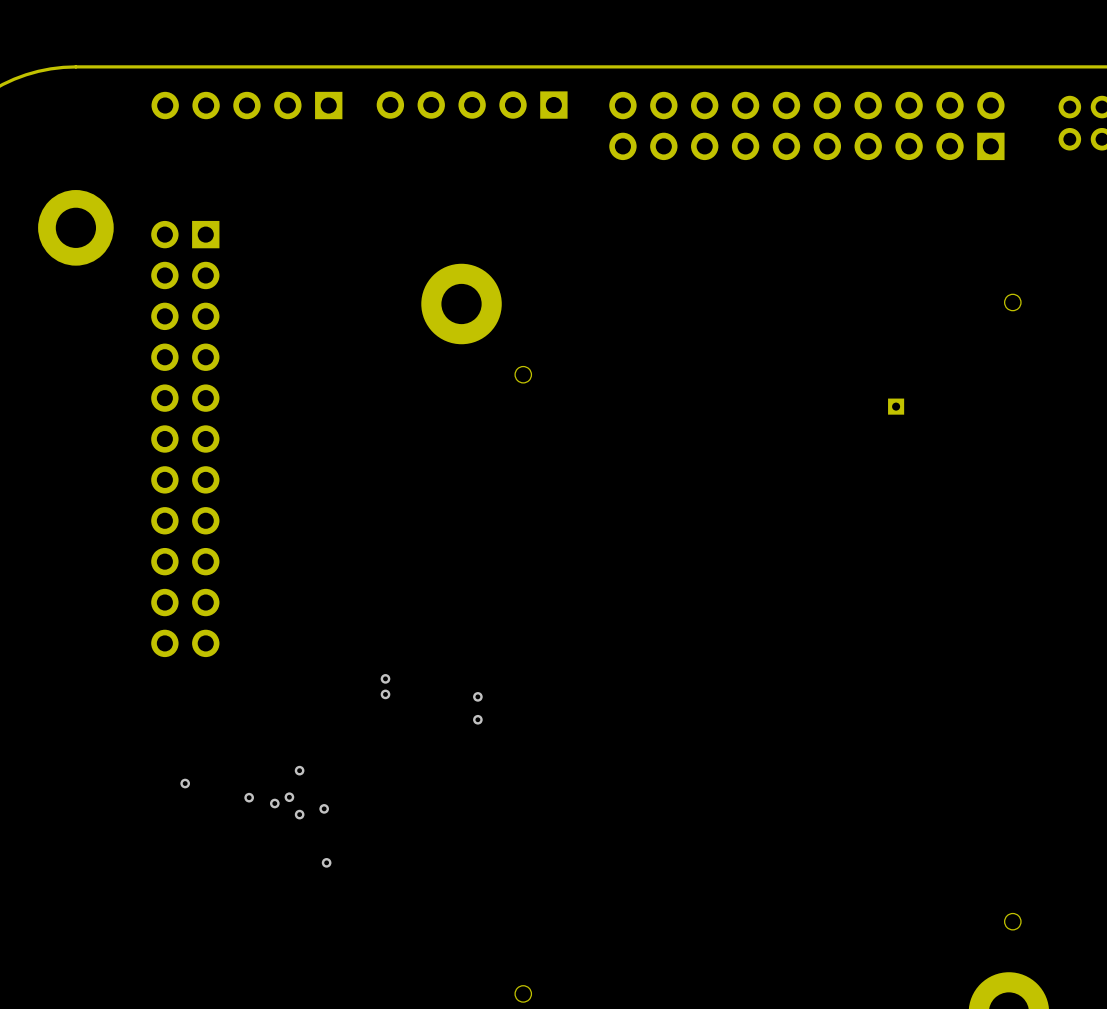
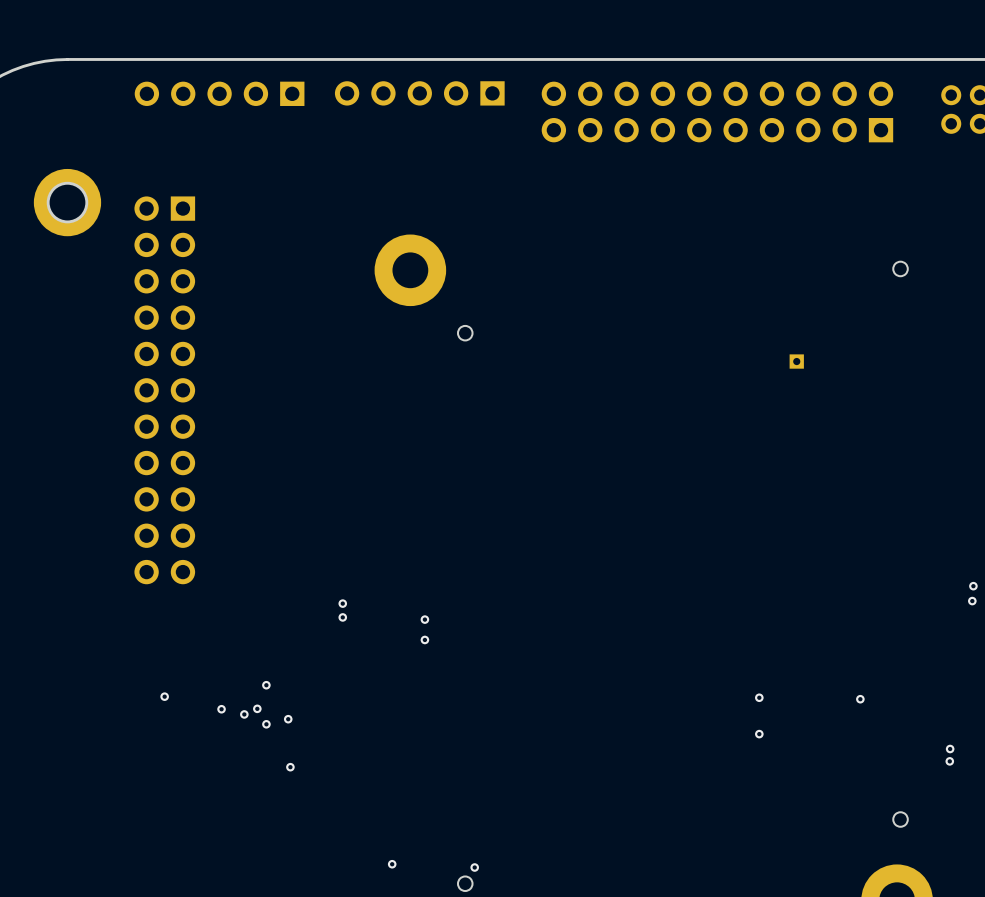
via: none -> (973, 586)
via: none -> (972, 601)
via: none -> (759, 697)
via: none -> (860, 699)
via: none -> (759, 734)
via: none -> (950, 749)
via: none -> (949, 761)
via: none -> (392, 864)
via: none -> (474, 867)

